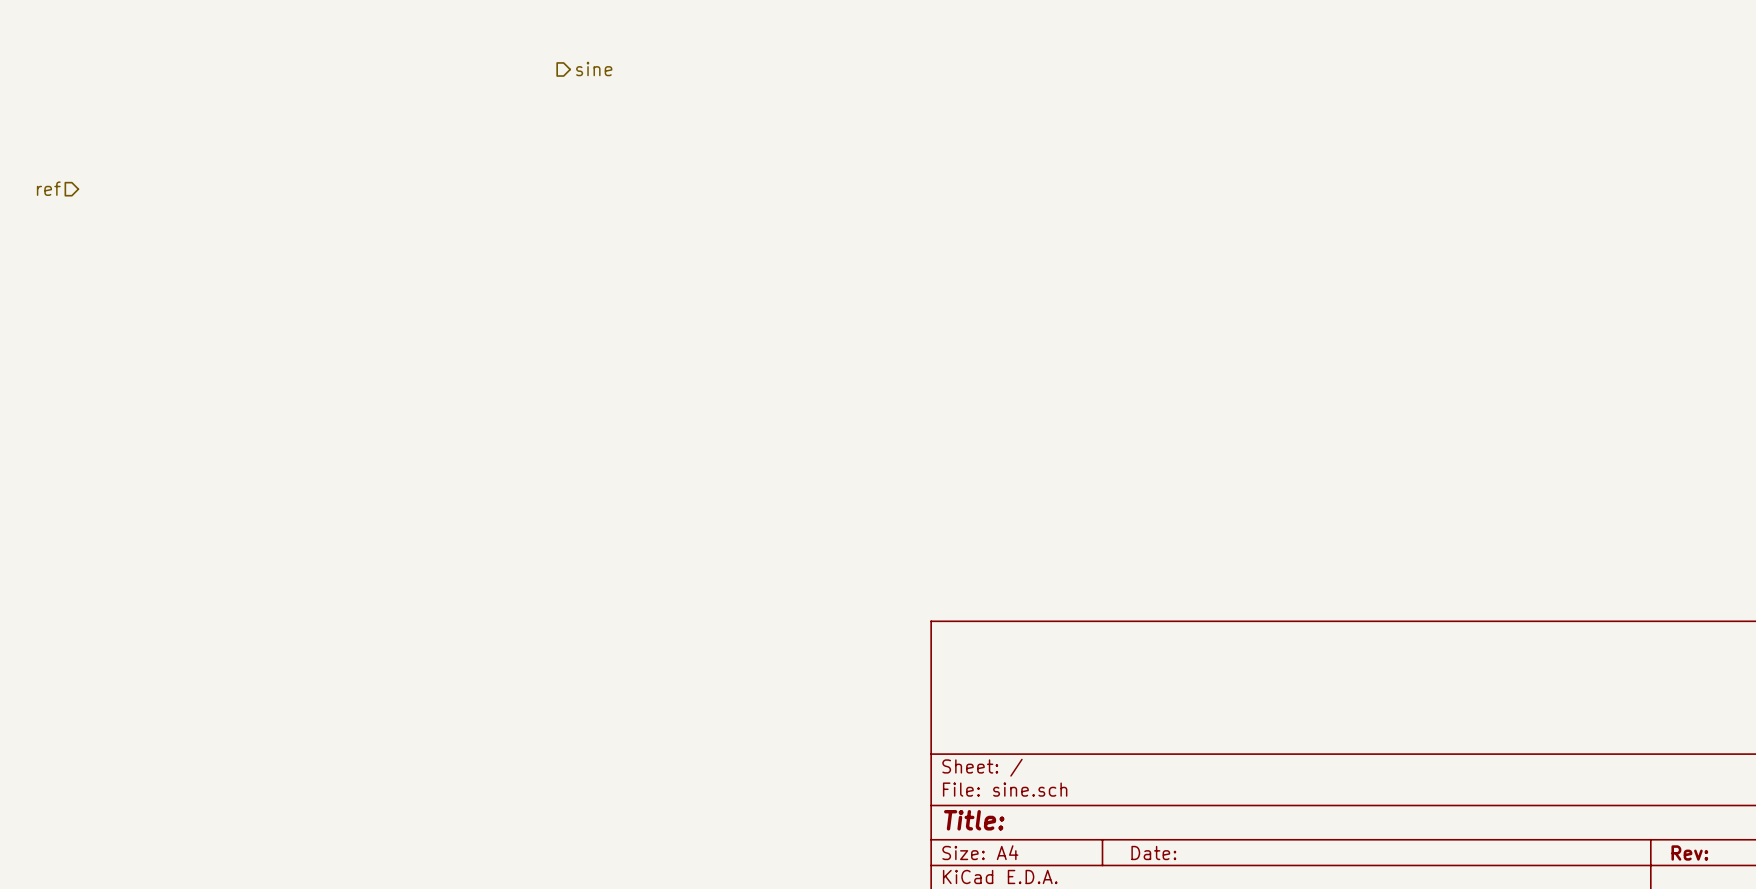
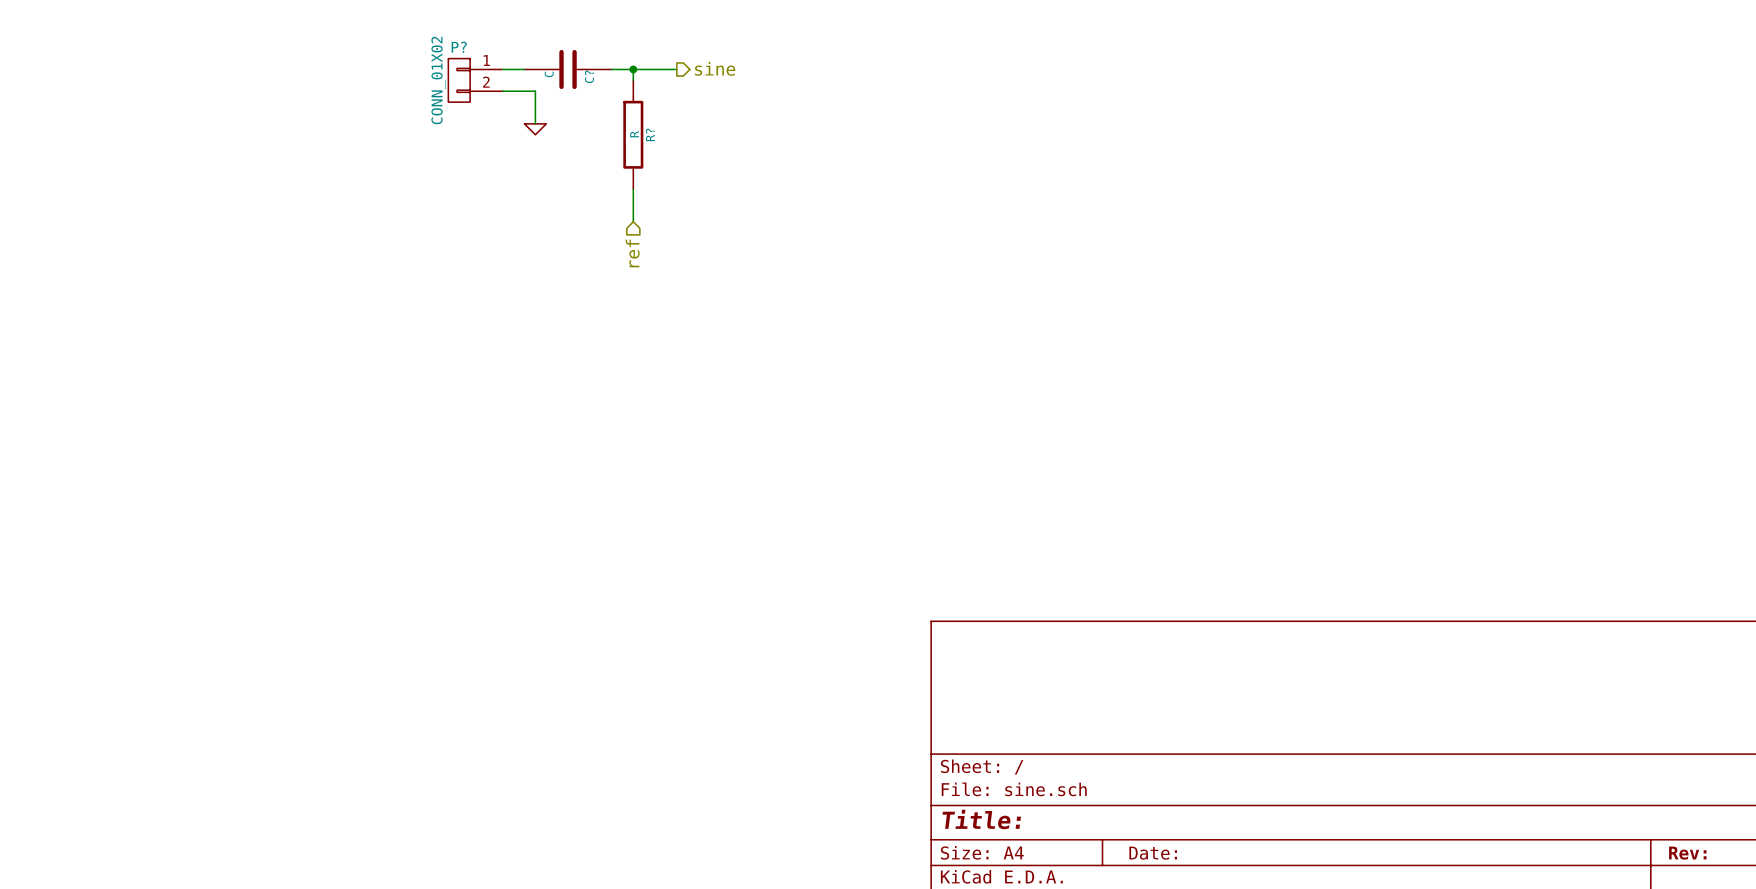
hierarchical label position: sine (594, 68) -> sine (715, 68)
wire: none -> (502, 69) (524, 69)
C?: none -> C (568, 69)
wire: none -> (611, 69) (676, 69)
wire: none -> (633, 69) (633, 80)
junction: none -> (633, 69)
P?: none -> CONN_01X02 (475, 80)
wire: none -> (502, 91) (535, 91) (535, 123)
power symbol: none -> (535, 129)
R?: none -> R (633, 134)
hierarchical label: ref (48, 188) -> none
wire: none -> (633, 189) (633, 221)
hierarchical label: none -> ref (632, 253)

